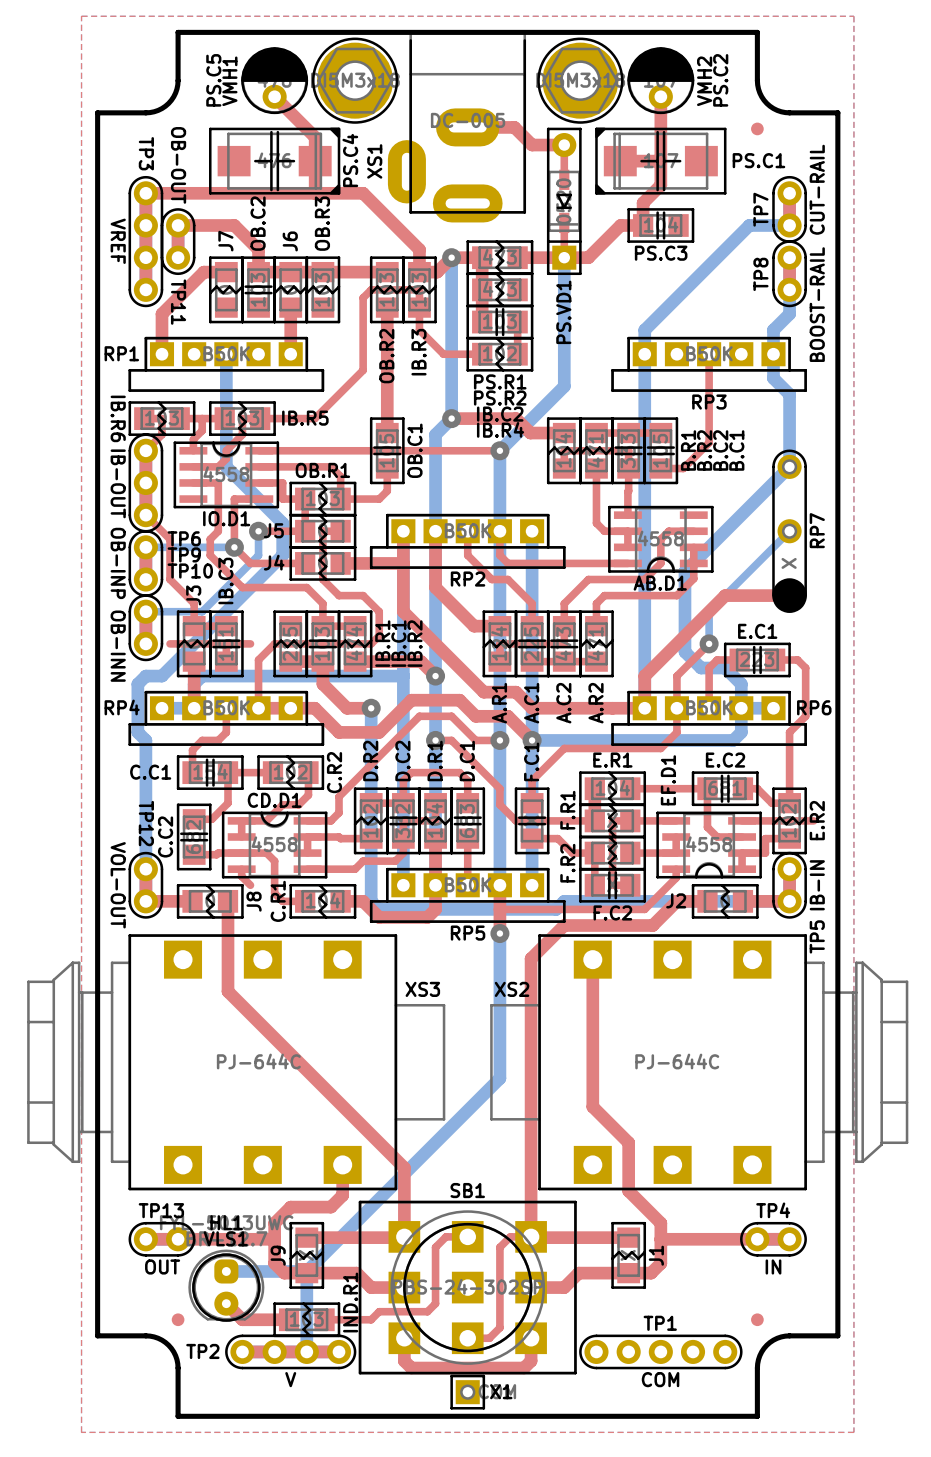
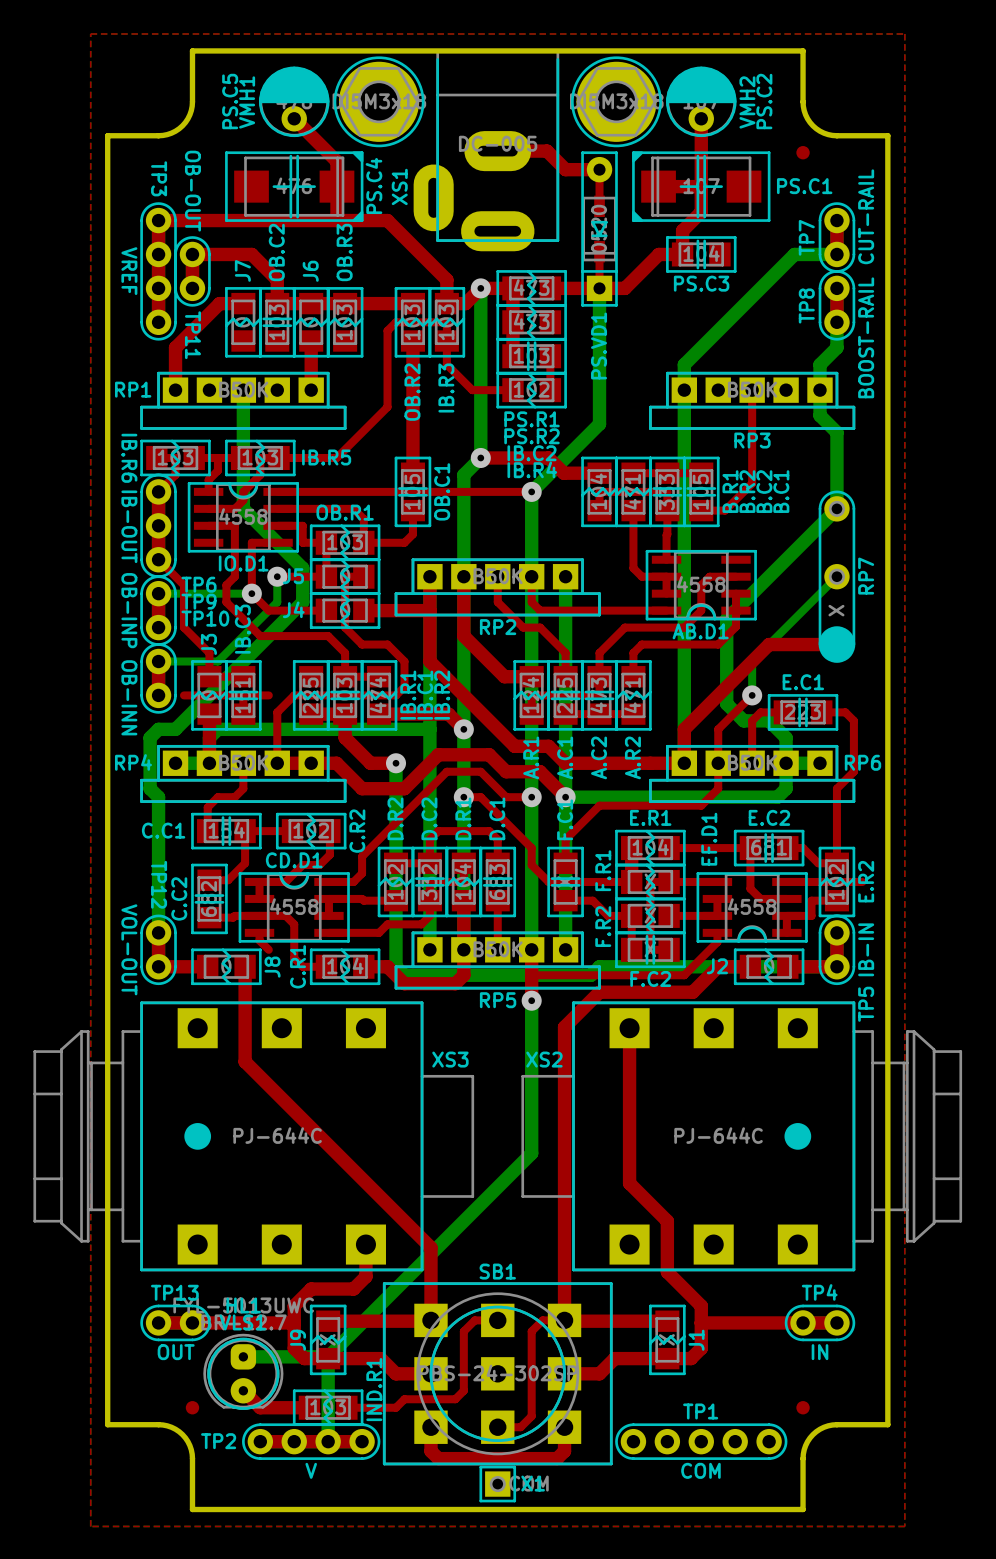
XS3 footprint: [27, 934, 446, 1191] -> [33, 1001, 475, 1272]
XS2 footprint: [490, 934, 909, 1191] -> [521, 1001, 963, 1272]

